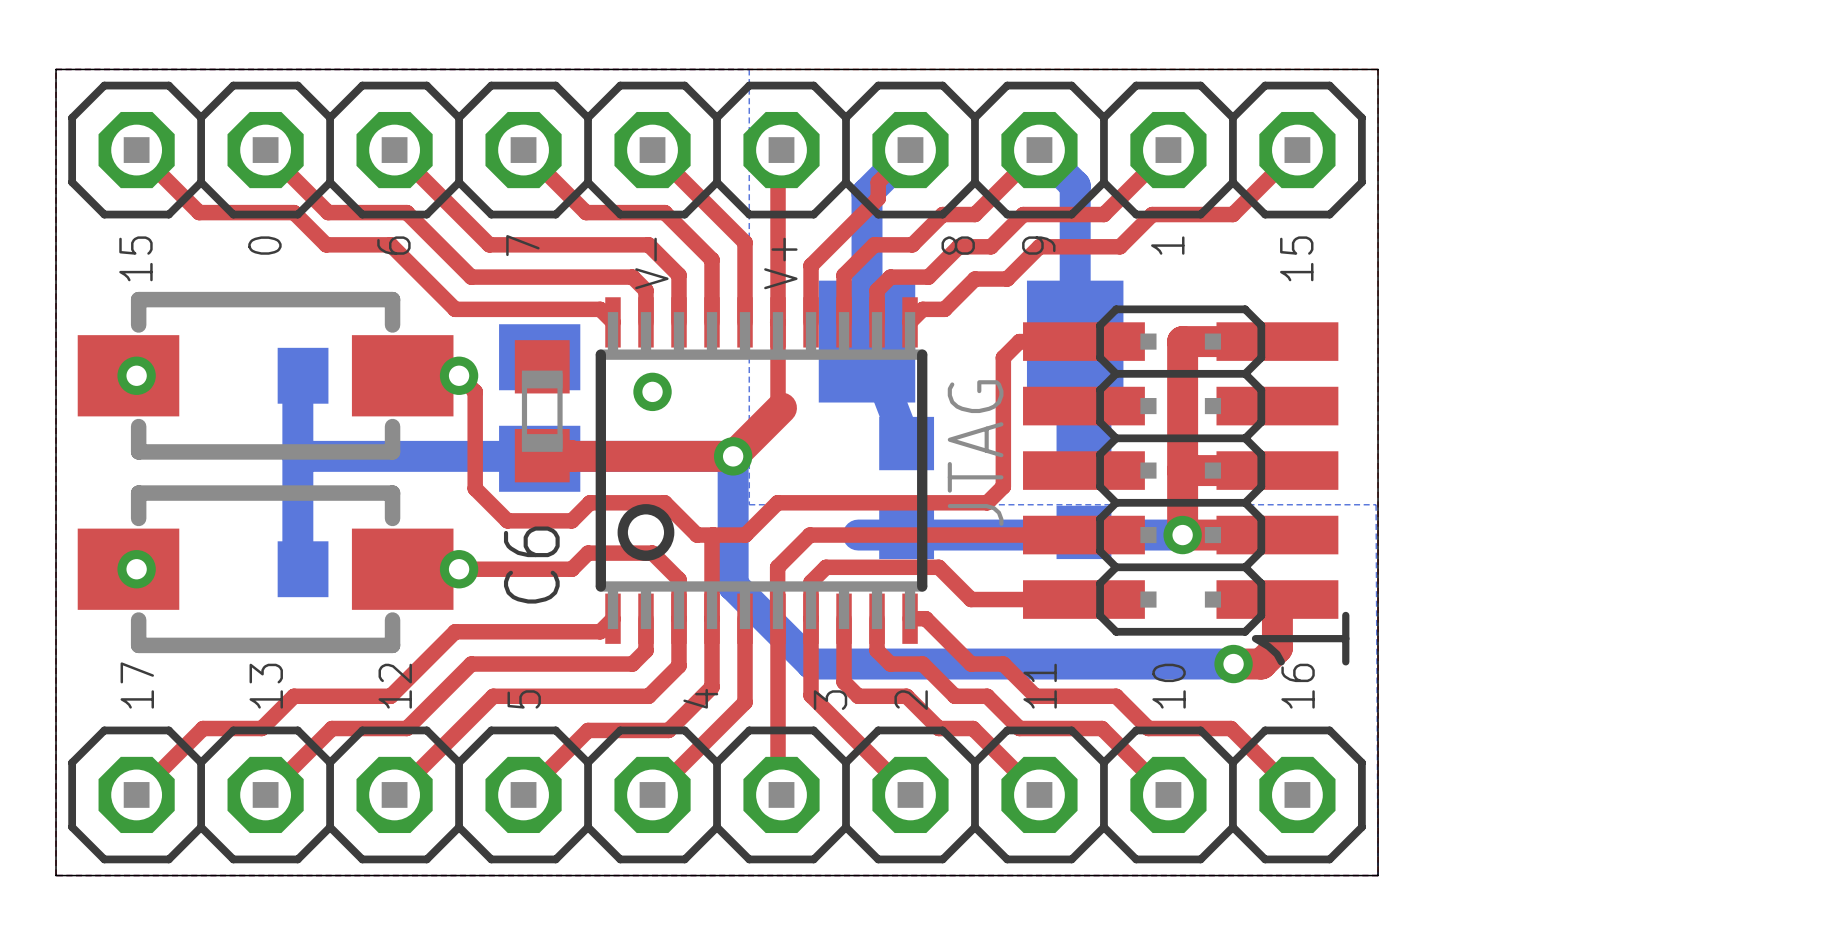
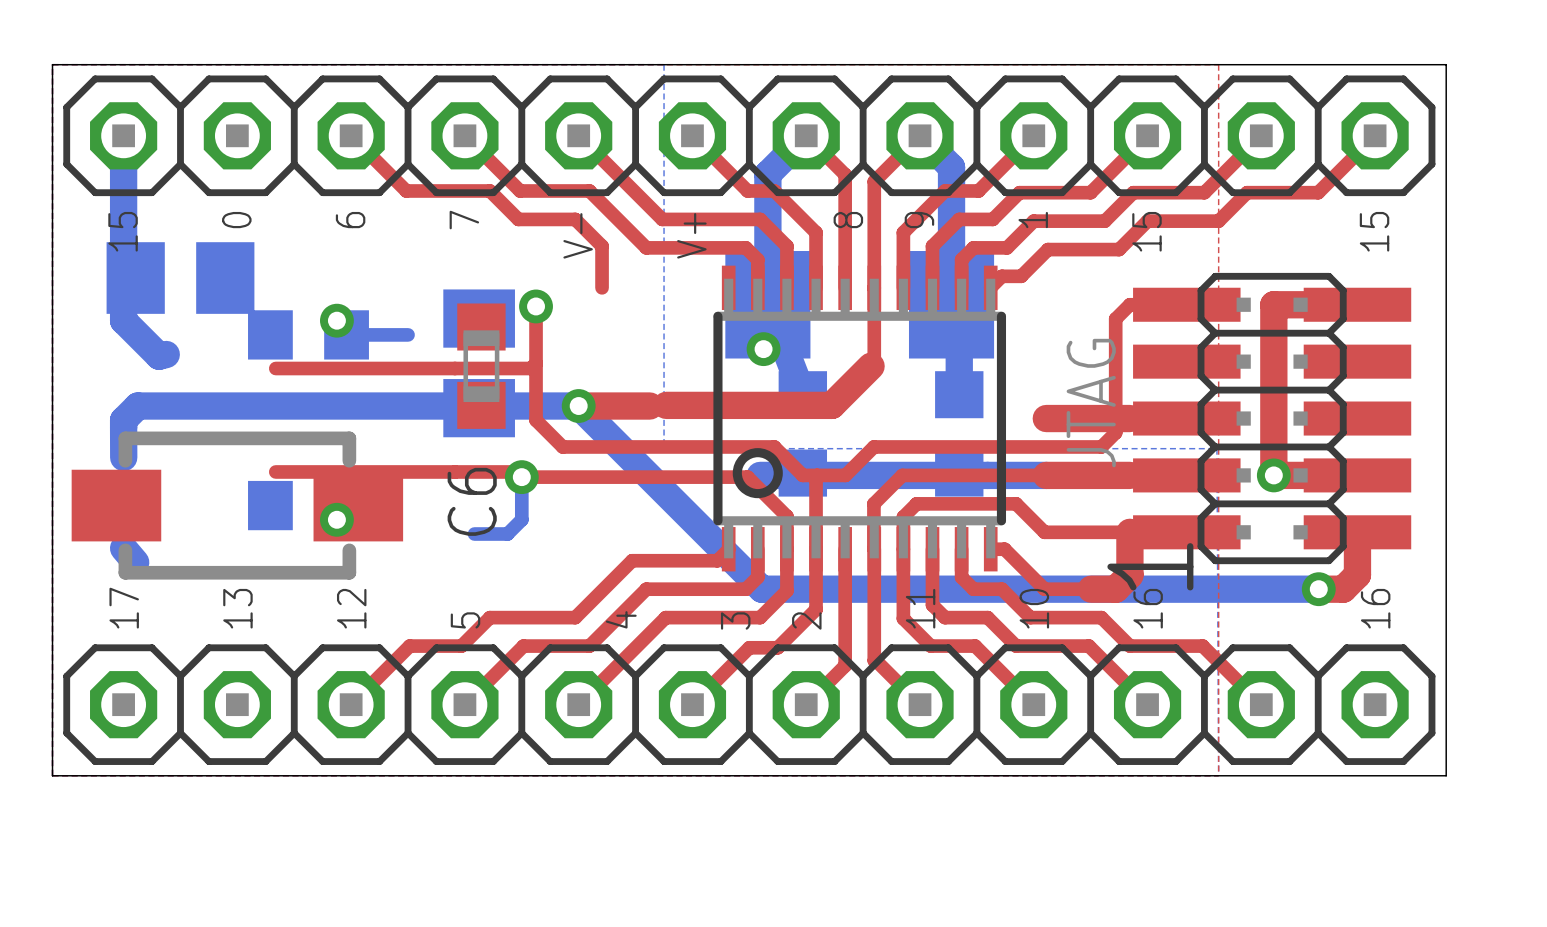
board edge: (1378, 69) (1378, 875) -> (1218, 64) (1446, 64) (1446, 775) (1218, 775)
top track: (136, 150) (199, 212) (293, 212) (326, 244) (390, 244) (455, 309) (600, 309) (612, 322) -> none
bottom track: none -> (123, 135) (123, 320) (159, 356) (166, 354)
top track: (265, 150) (328, 212) (406, 212) (471, 277) (632, 277) (645, 290) (645, 322) -> none
part: (717, 150) -> none
top track: (781, 150) (778, 153) (778, 404) (781, 408) (733, 456) -> (692, 135) (747, 190) (774, 190) (816, 232) (816, 287)
part: none -> (749, 135)
top track: (910, 150) (878, 182) (878, 198) (811, 265) (811, 322) -> (806, 135) (845, 174) (845, 287)
top track: none -> (1261, 135) (1204, 192) (1133, 192) (1104, 221) (1033, 221) (1007, 247) (973, 247) (961, 259) (961, 287)
top track: none -> (1375, 135) (1318, 192) (1247, 192) (1218, 221) (1147, 221) (1119, 249) (1048, 249) (1021, 276) (1001, 276) (990, 287)
top track: (987, 201) (974, 214) (942, 214) (912, 244) (874, 244) (844, 275) (844, 322) -> (874, 181) (874, 363) (831, 405) (666, 405)
top track: (457, 212) (489, 244) (584, 244) -> (406, 190) (489, 190) (518, 219)
top track: (1105, 212) (1103, 214) (1023, 214) (991, 246) (958, 246) (928, 277) (890, 277) (877, 290) (877, 322) -> (978, 190) (945, 190) (903, 232) (903, 287)
top track: (745, 242) (745, 322) -> (660, 217) (662, 219) (760, 219) (786, 246) (786, 287)
top track: (1122, 244) (1120, 246) (1039, 246) (1007, 279) (974, 279) (944, 309) (922, 309) (910, 322) -> (992, 219) (959, 219) (932, 246) (932, 287)
text: none -> 15 (1374, 231)
top track: (712, 259) (712, 322) -> (631, 232) (646, 247) (745, 247) (757, 259) (757, 287)
part: none -> (180, 278)
top track: (1083, 341) (1019, 341) (1003, 357) (1003, 486) (987, 502) (874, 502) -> none
top track: (1277, 341) (1182, 341) (1182, 535) -> (959, 475) (1046, 475)
top track: none -> (1186, 304) (1129, 304) (1115, 318) (1115, 432) (1101, 446) (873, 446) (845, 475)
top track: none -> (1357, 304) (1273, 304) (1273, 475) (1357, 475)
via: none -> (536, 306)
via: none -> (336, 320)
via: (136, 375) -> none
part: (265, 375) -> none
bottom track: (303, 375) (297, 380) (297, 564) (303, 569) -> none
top track: (402, 375) (459, 375) (475, 391) (475, 488) (507, 520) (571, 520) (589, 502) (634, 502) -> (536, 306) (536, 420) (562, 446)
via: (459, 375) -> none
via: (652, 391) -> none
via: none -> (763, 349)
top track: none -> (536, 363) (530, 368) (275, 368)
bottom track: none -> (265, 406) (137, 406) (123, 420) (123, 457)
top track: (571, 456) (652, 456) -> none
bottom track: (652, 456) (733, 456) (733, 585) (811, 664) (860, 664) -> (578, 406) (761, 589)
via: none -> (578, 406)
via: (733, 456) -> none
part position: (761, 470) -> (859, 418)
part position: (1180, 470) -> (1272, 418)
top track: (664, 502) (697, 535) (745, 535) (777, 502) -> (589, 446) (689, 446)
top track: (713, 535) (712, 687) (668, 730) (588, 730) -> (757, 549) (757, 577) (745, 589) (646, 589) (589, 646) (523, 646) (521, 647)
top track: (906, 535) (809, 535) (777, 567) (777, 618) -> (802, 475) (774, 446)
top track: (954, 535) (1019, 535) -> (873, 548) (873, 503) (902, 475)
via: (1182, 535) -> none
via: none -> (1273, 475)
bottom track: none -> (521, 477) (521, 519) (507, 534) (474, 534)
via: none -> (521, 477)
via: (136, 569) -> none
top track: (402, 569) (571, 569) (588, 553) (652, 553) (679, 579) (679, 665) -> (728, 549) (717, 560) (632, 560) (602, 590)
via: (459, 569) -> none
via: none -> (336, 519)
top track: (1083, 599) (971, 599) (938, 567) (826, 567) (811, 582) (811, 695) (910, 794) -> (845, 549) (845, 665) (806, 704)
top track: none -> (1357, 532) (1357, 574) (1343, 589) (1318, 589)
bottom track: none -> (123, 548) (135, 562)
top track: (645, 618) (645, 650) (632, 664) (471, 664) (406, 728) (332, 728) (265, 794) -> none
top track: (745, 618) (745, 702) -> (275, 471) (516, 471) (521, 477) (747, 477) (786, 516) (786, 590) (760, 617) (665, 617) (660, 623)
top track: (778, 618) (778, 791) (781, 794) -> (817, 475) (816, 609) (777, 647) (749, 647) (692, 704)
top track: (844, 618) (844, 682) (858, 696) (906, 696) (938, 728) (973, 728) (989, 745) -> (874, 549) (874, 660) (875, 660)
top track: (877, 618) (877, 650) (890, 664) (922, 664) (954, 696) (987, 696) (1019, 728) (1051, 728) -> (1186, 532) (1044, 532) (1016, 503) (916, 503) (903, 517) (903, 618) (930, 646)
top track: (910, 618) (925, 618) (971, 664) (1003, 664) (1035, 696) (1067, 696) -> (932, 549) (932, 605) (945, 617)
top track: none -> (961, 549) (961, 577) (973, 589) (1001, 589) (1030, 617) (1101, 617) (1129, 646) (1202, 646) (1261, 704)
top track: none -> (990, 549) (1004, 549) (1044, 589) (1091, 589)
top track: (612, 619) (600, 631) (455, 631) (390, 696) (293, 696) (261, 728) (203, 728) (136, 794) -> none
bottom track: none -> (1091, 589) (1318, 589)
via: (1233, 664) -> none
via: none -> (1318, 589)
text: none -> 16 (1375, 608)
top track: (551, 696) (493, 696) (461, 728) -> (489, 617) (461, 646) (409, 646)
part: (717, 794) -> none
part: none -> (749, 704)

